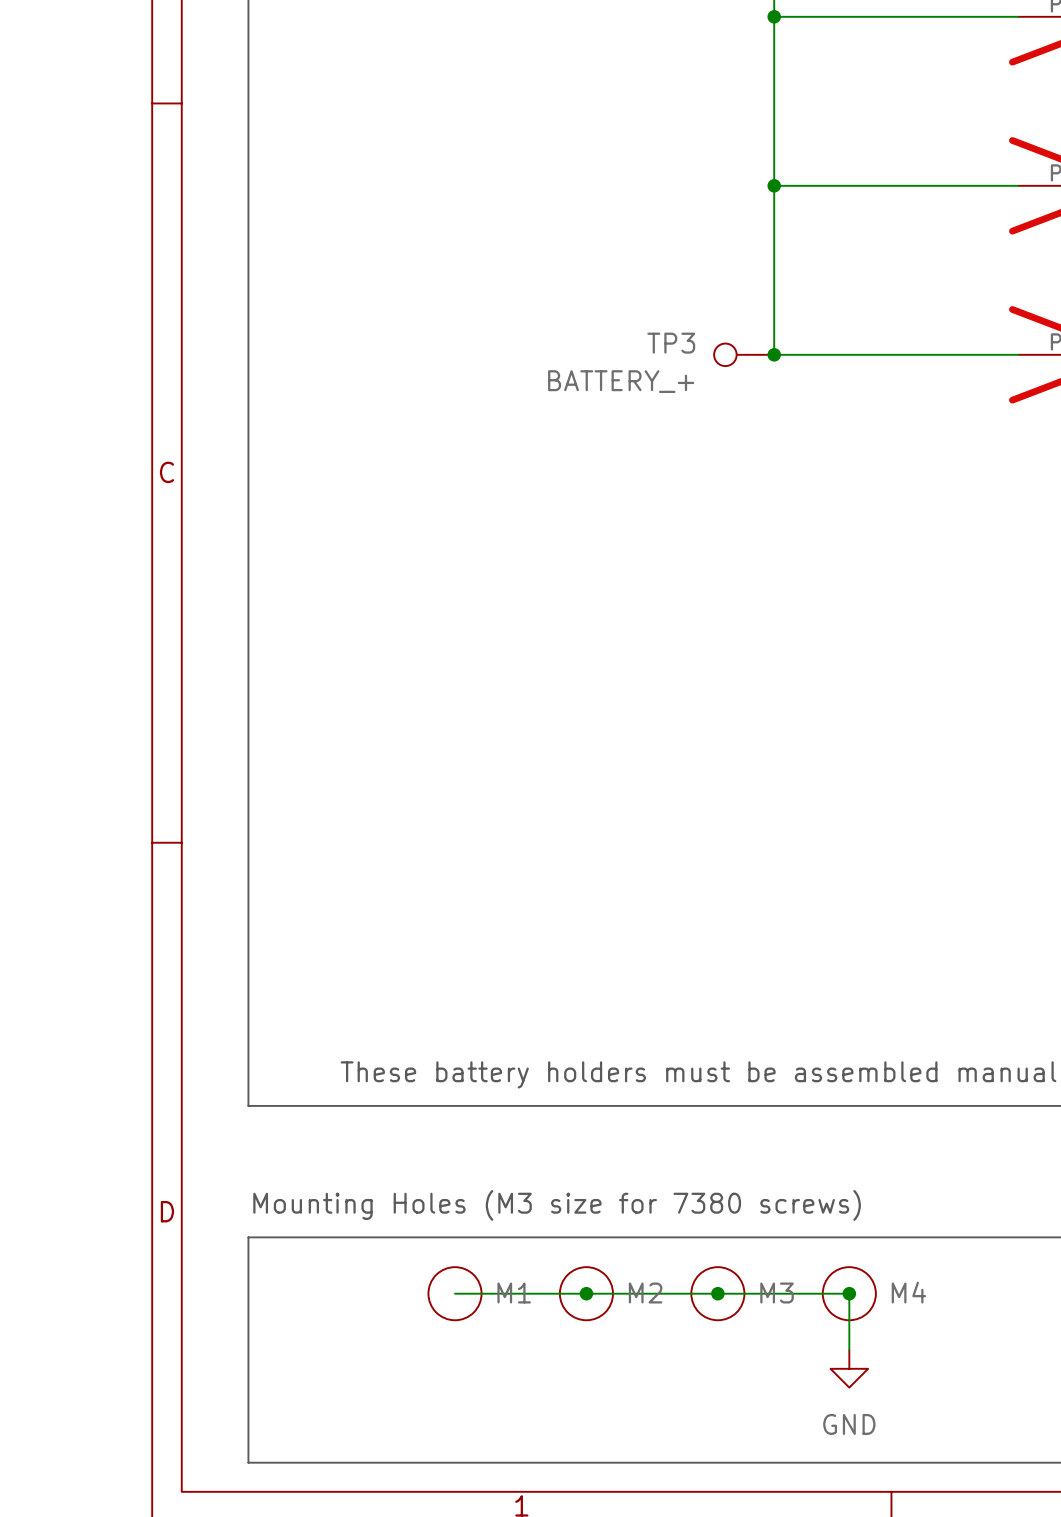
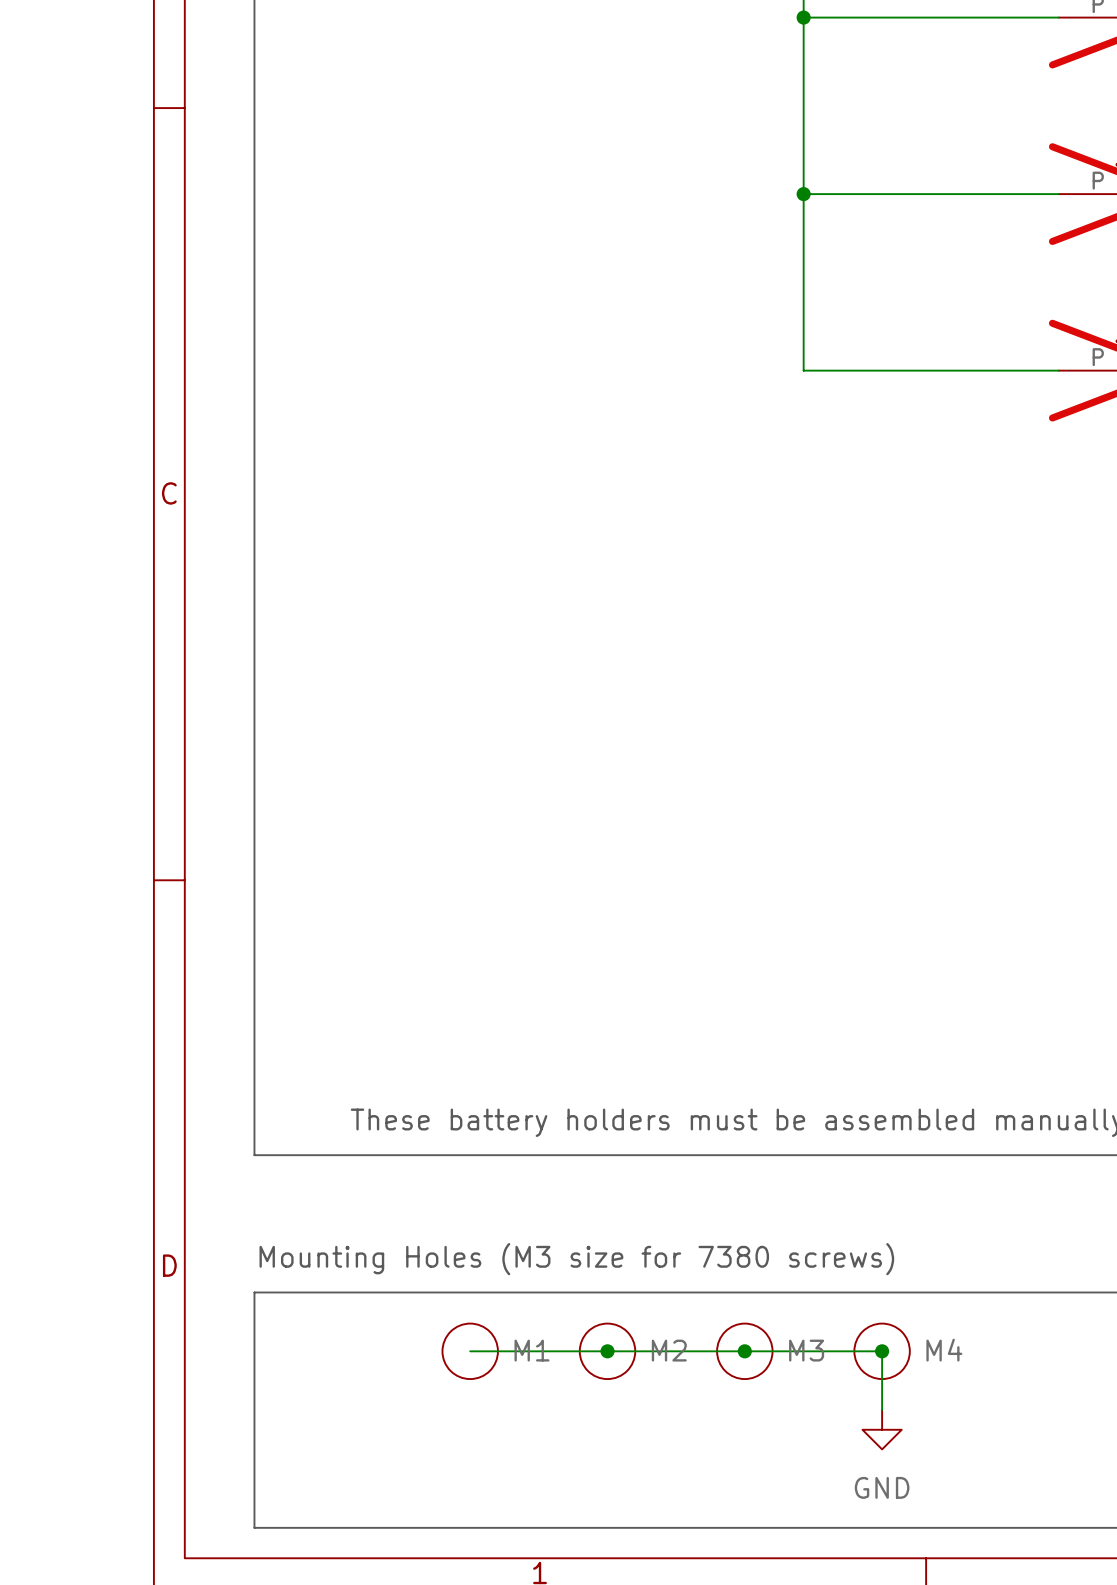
TP3: BATTERY_+ (744, 354) -> none
junction: (774, 354) -> none

